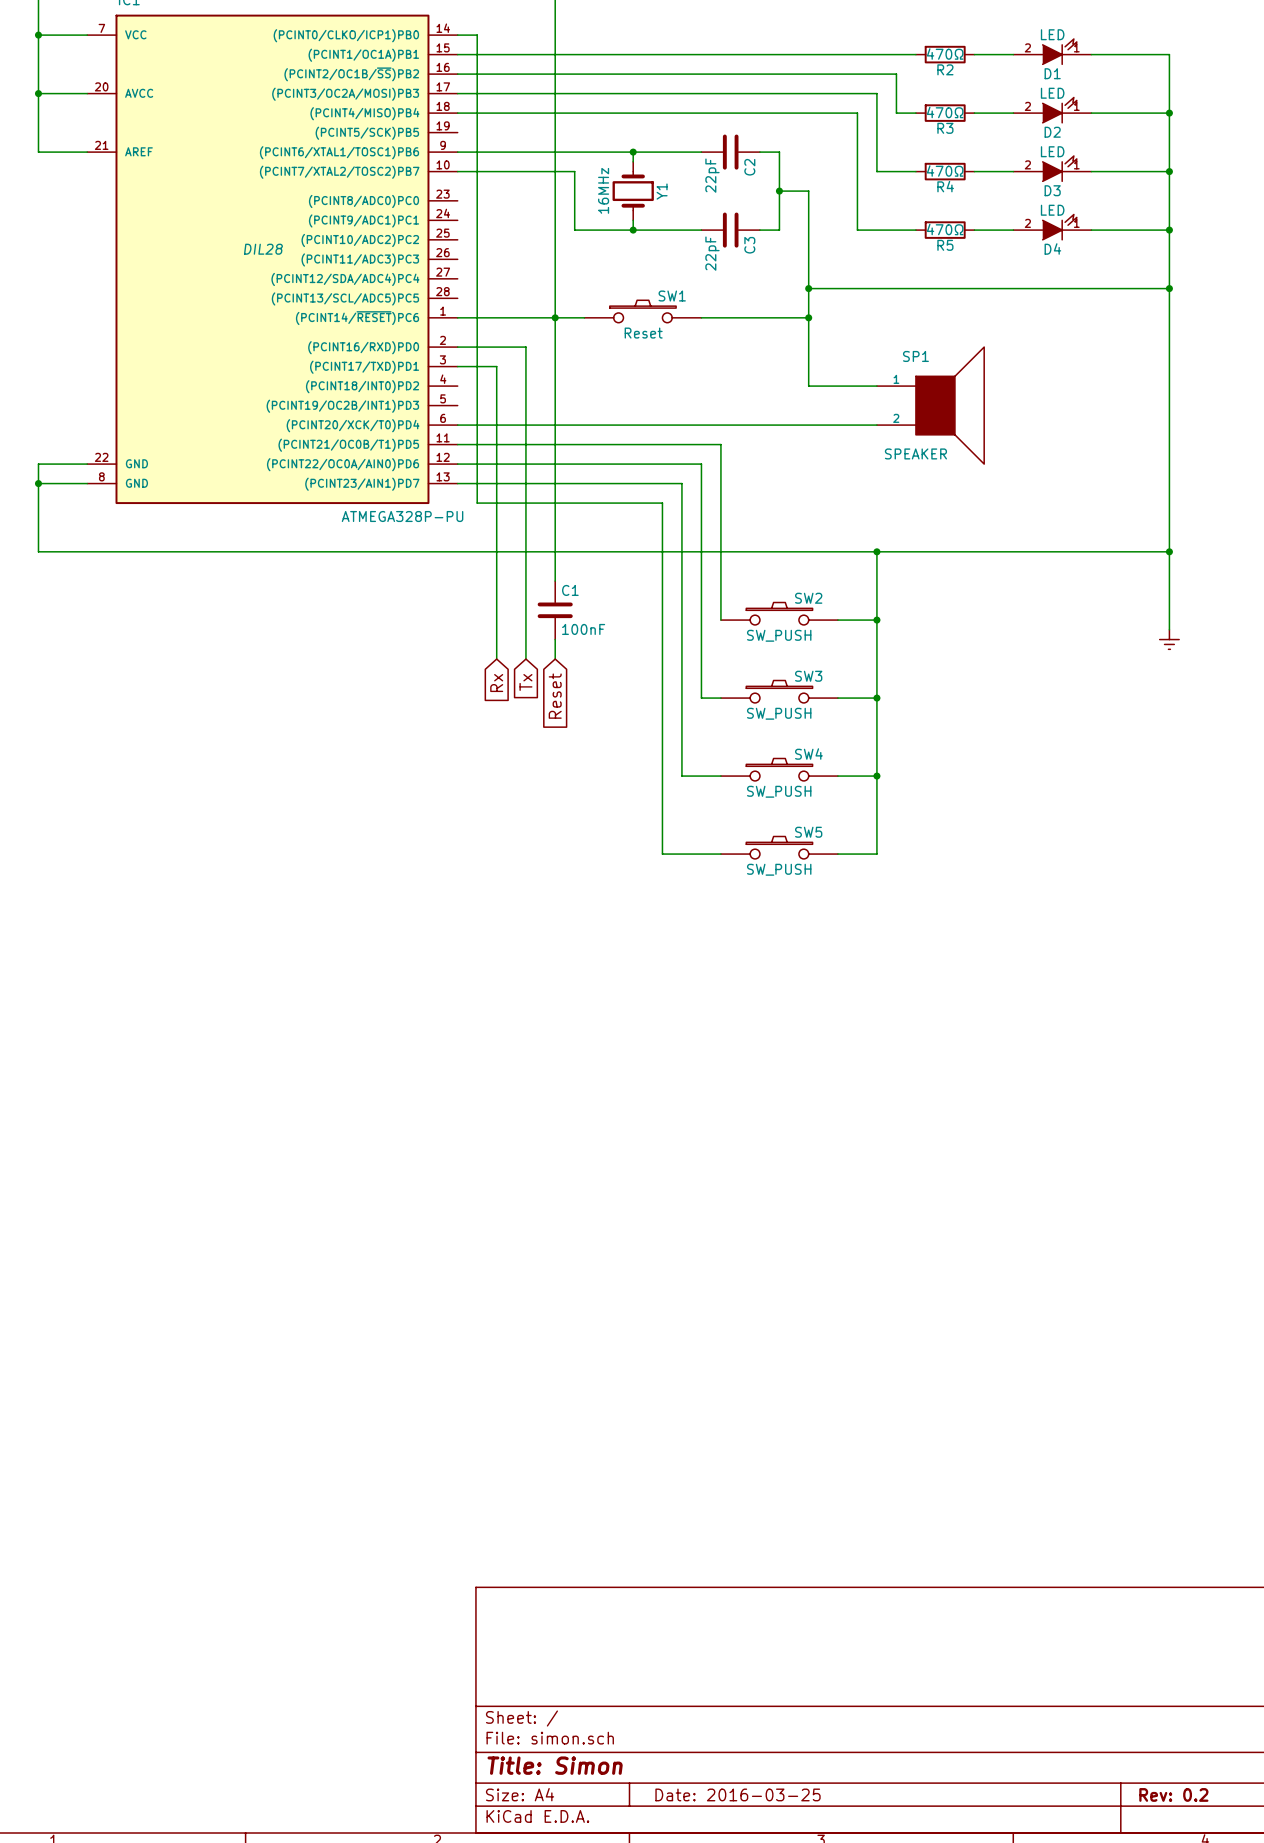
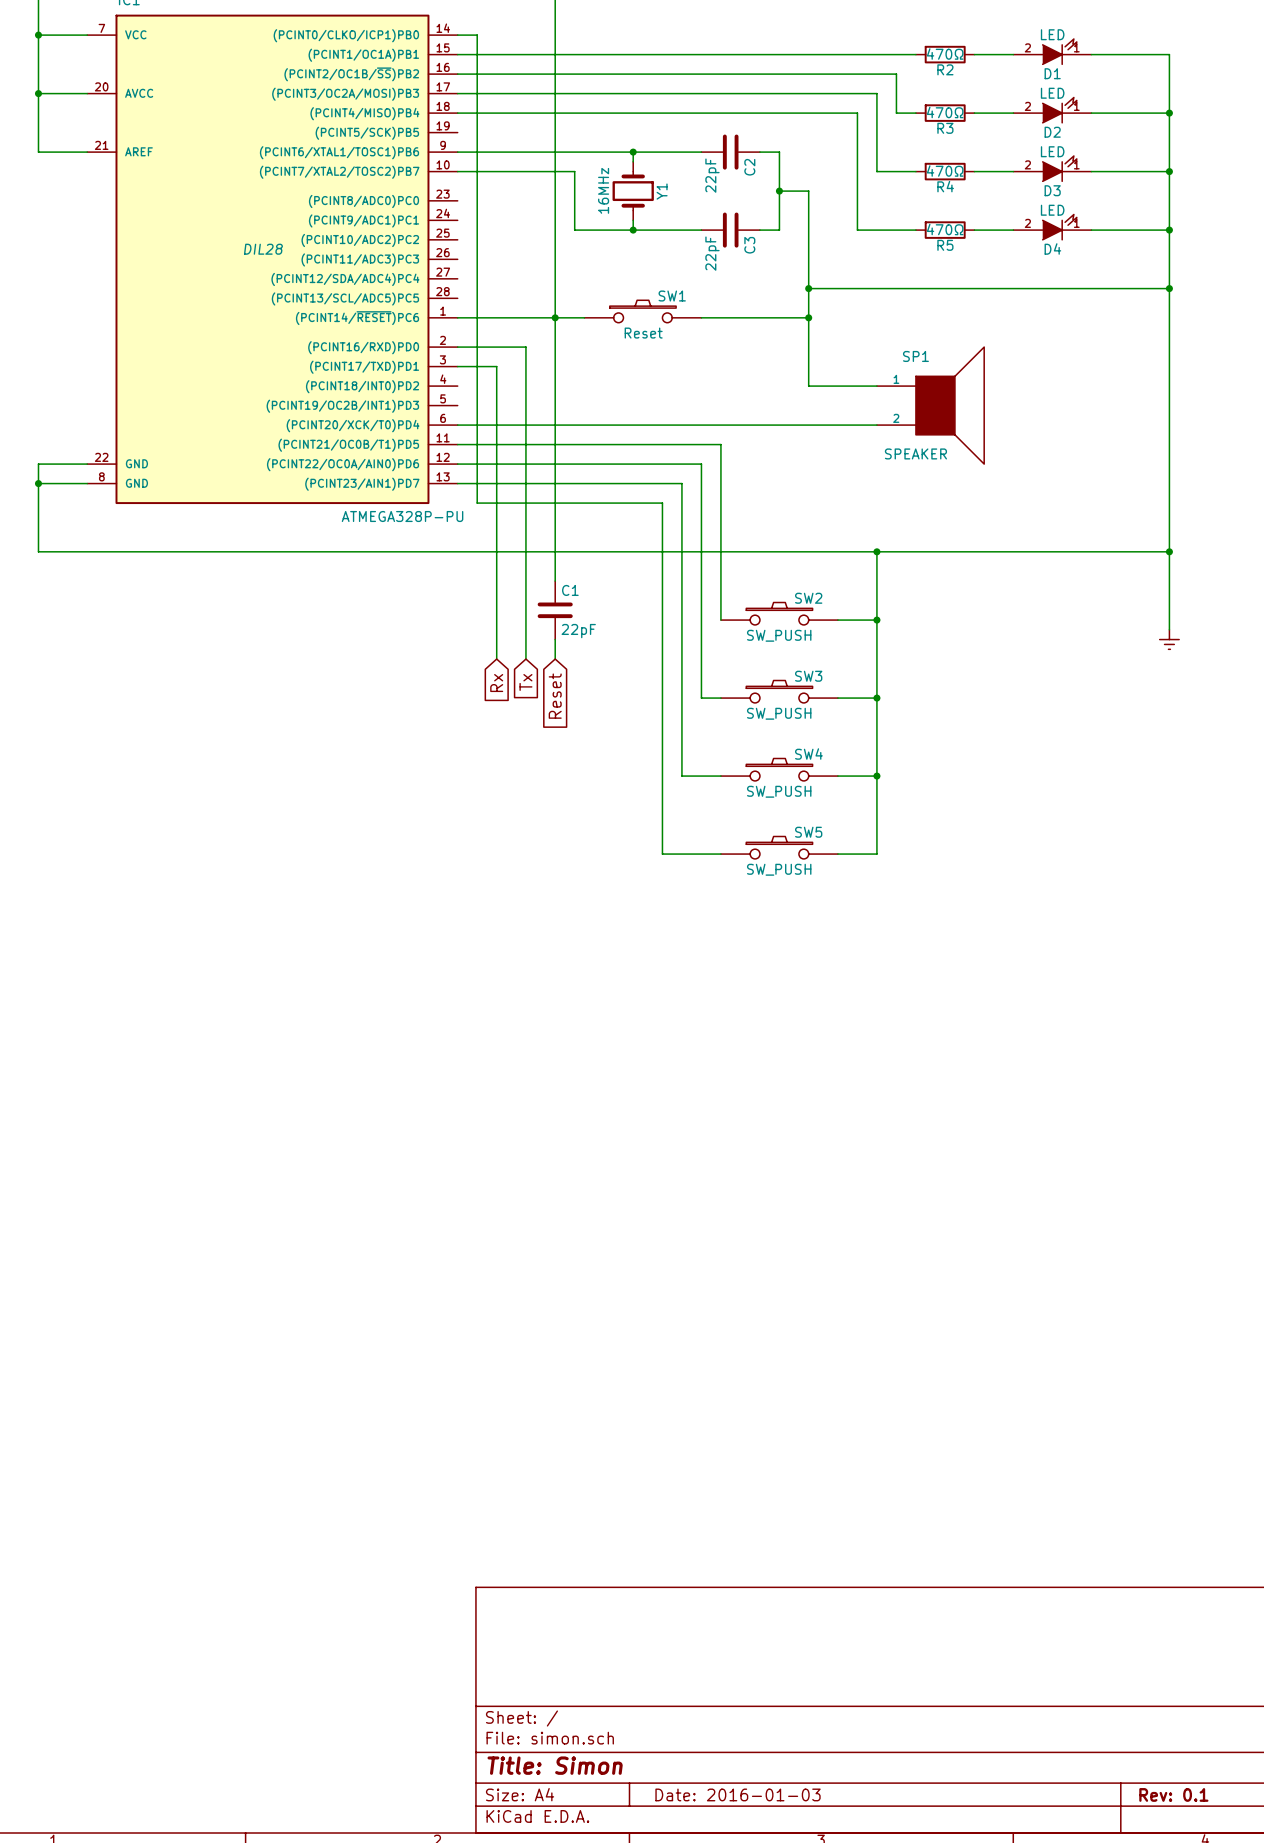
C1 value: 100nF (583, 629) -> 22pF (578, 631)
title block: Date: 2016-03-25 (738, 1794) -> Date: 2016-01-03 (738, 1794)
title block: Rev: 0.2 (1173, 1794) -> Rev: 0.1 (1173, 1794)

